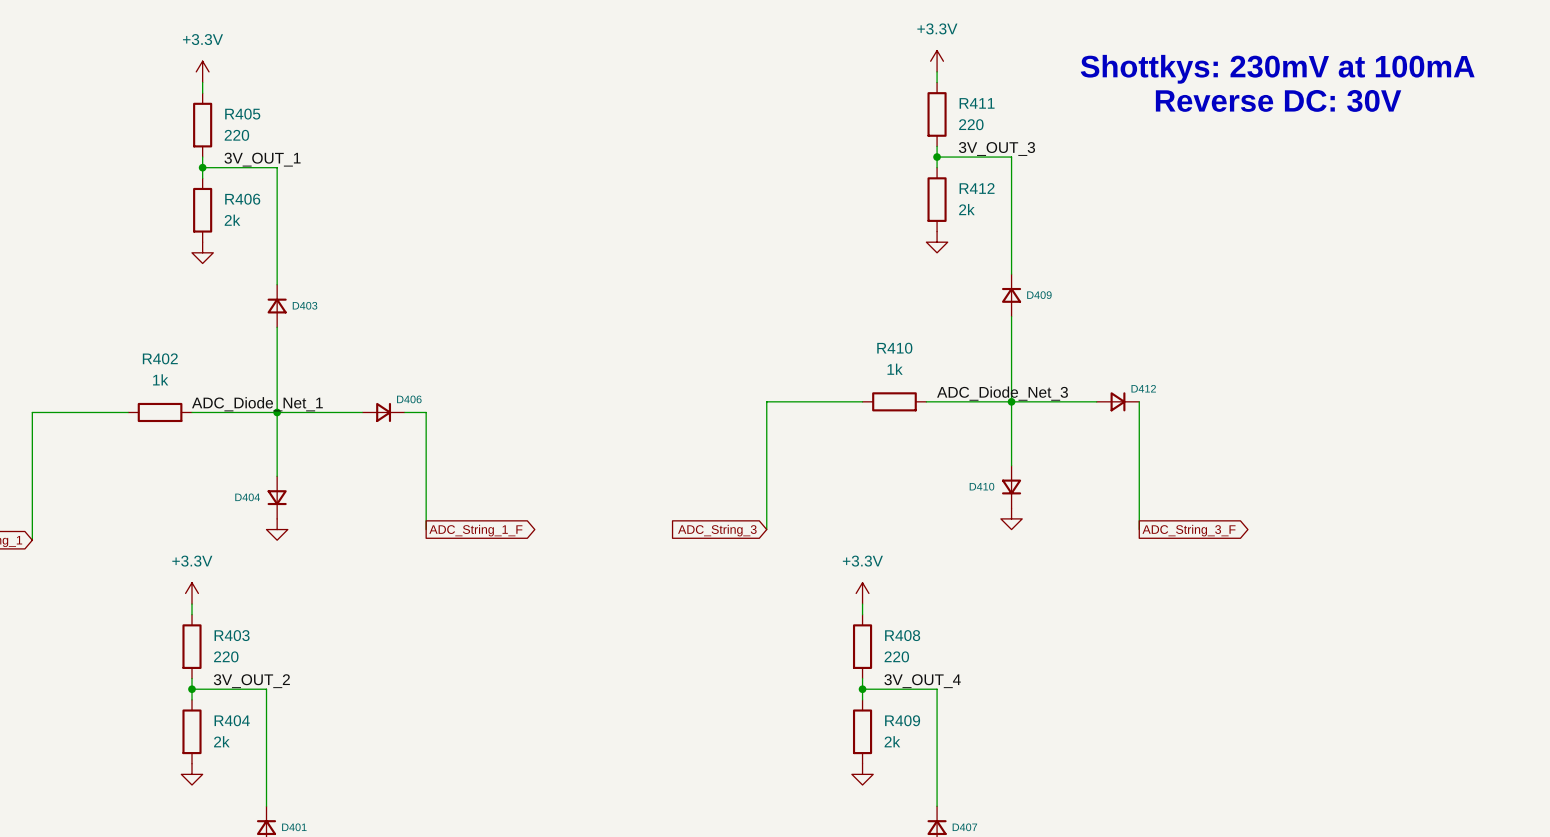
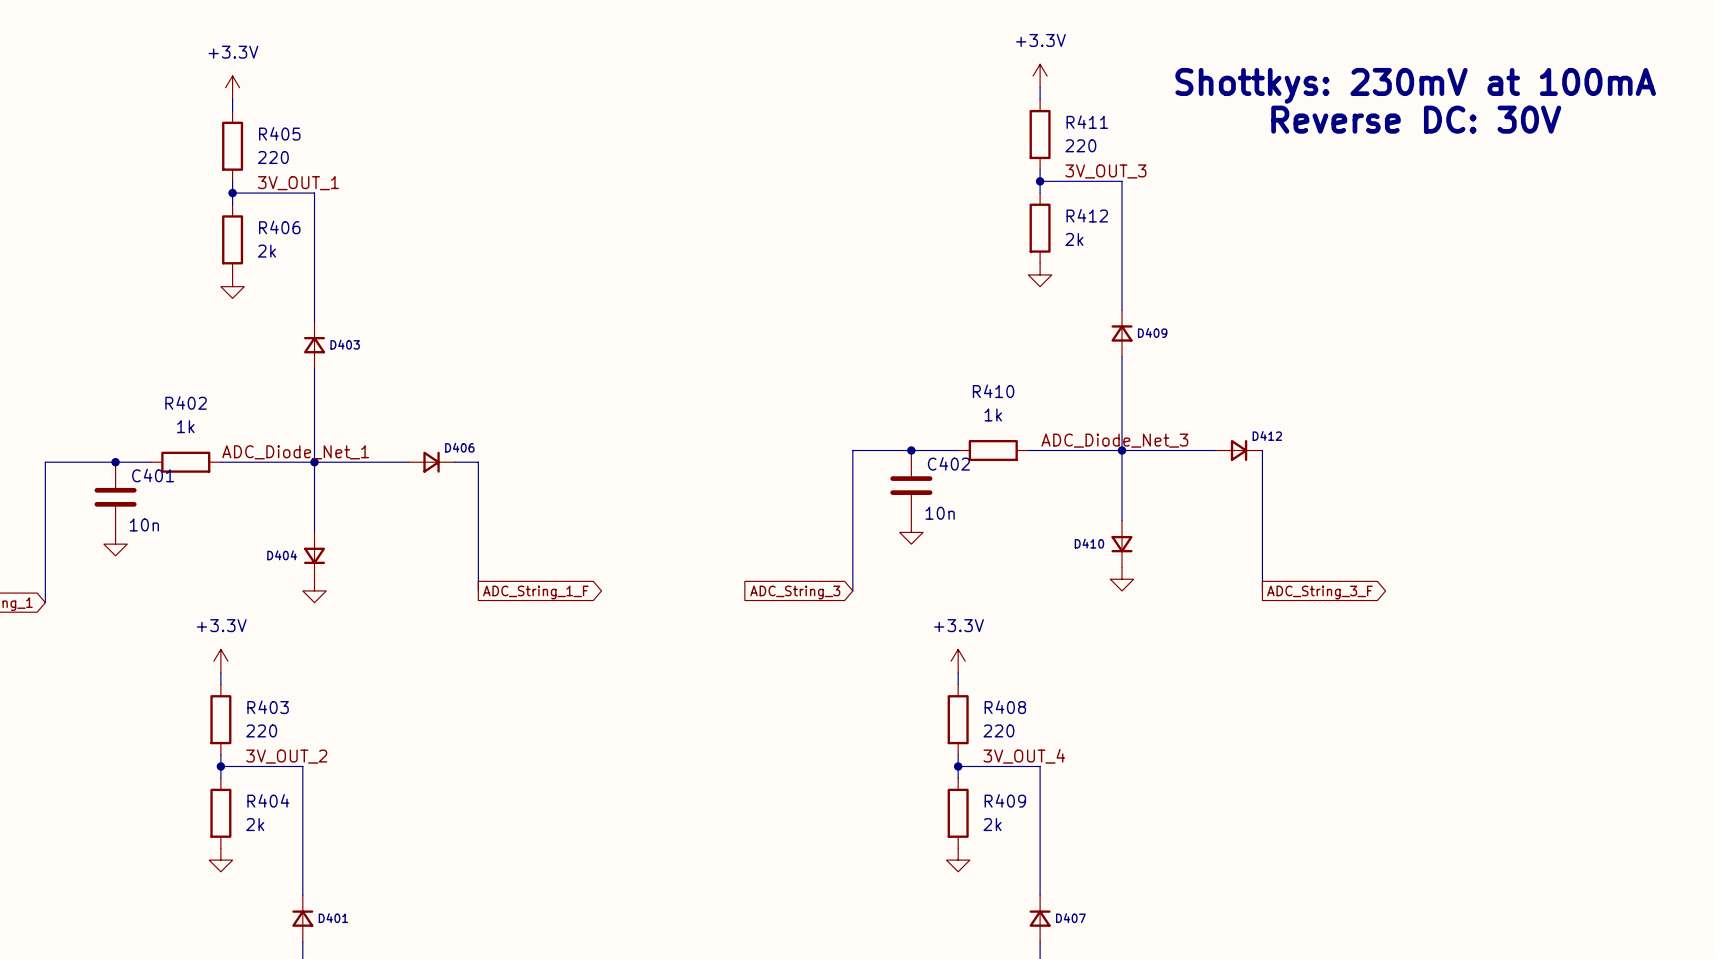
junction: none -> (911, 450)
junction: none -> (115, 462)
C402: none -> 10n (911, 485)
C401: none -> 10n (115, 497)
power symbol: none -> (911, 532)
power symbol: none -> (115, 544)

